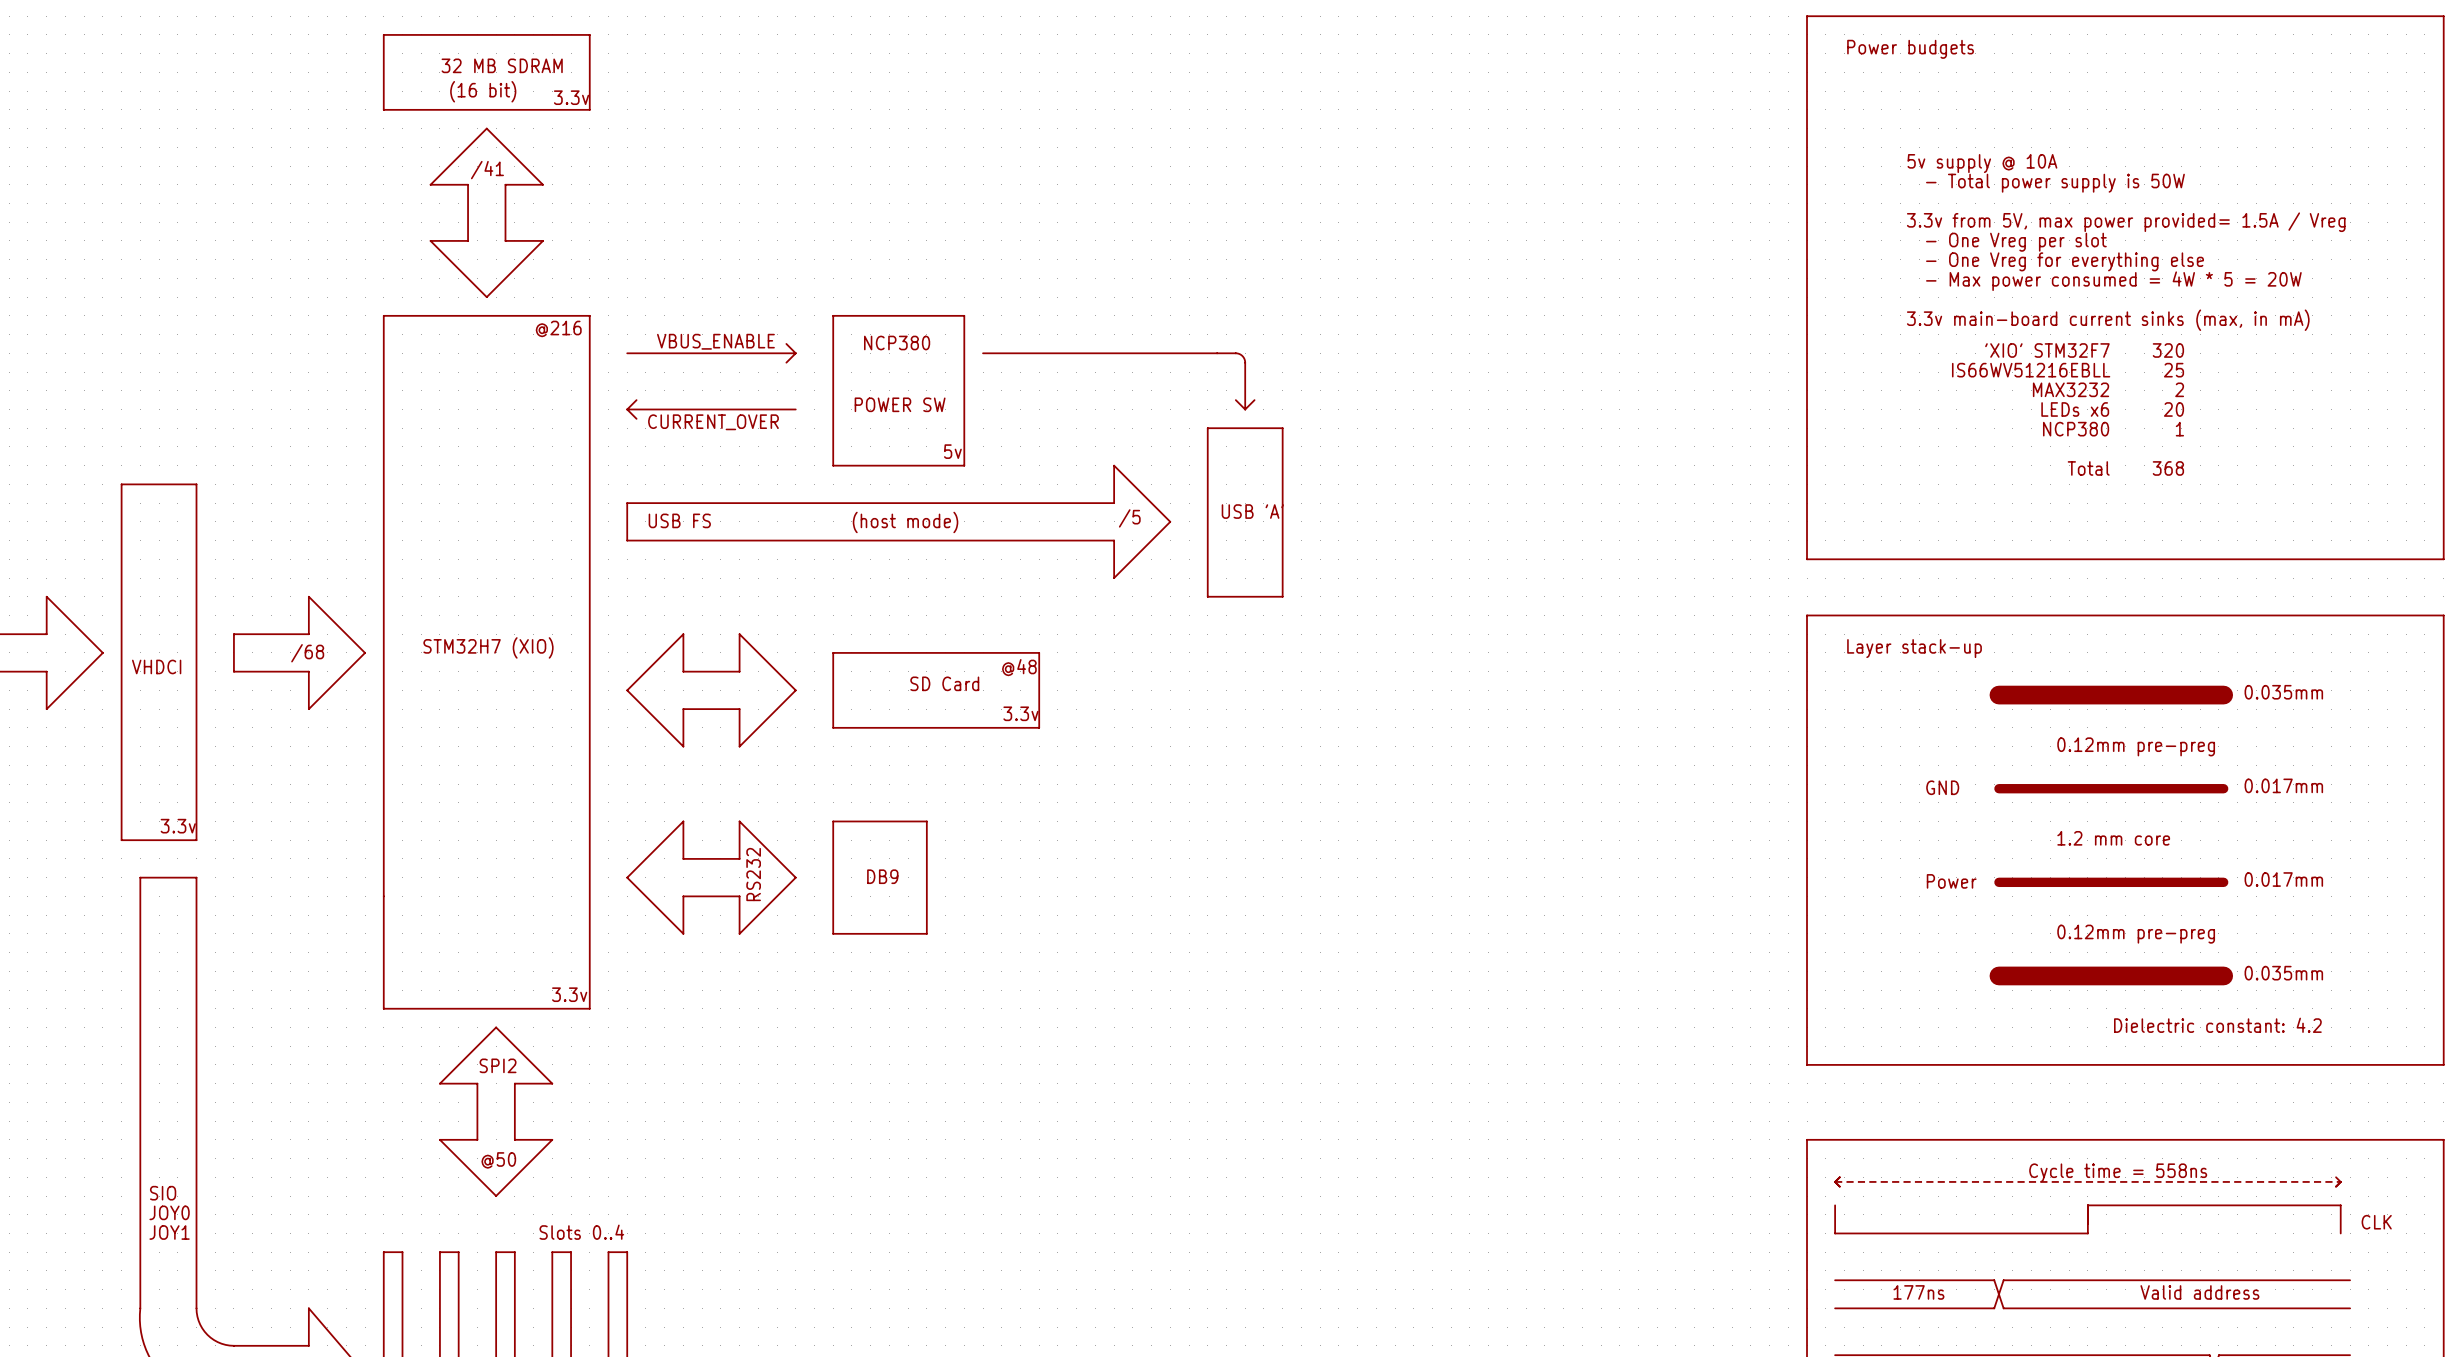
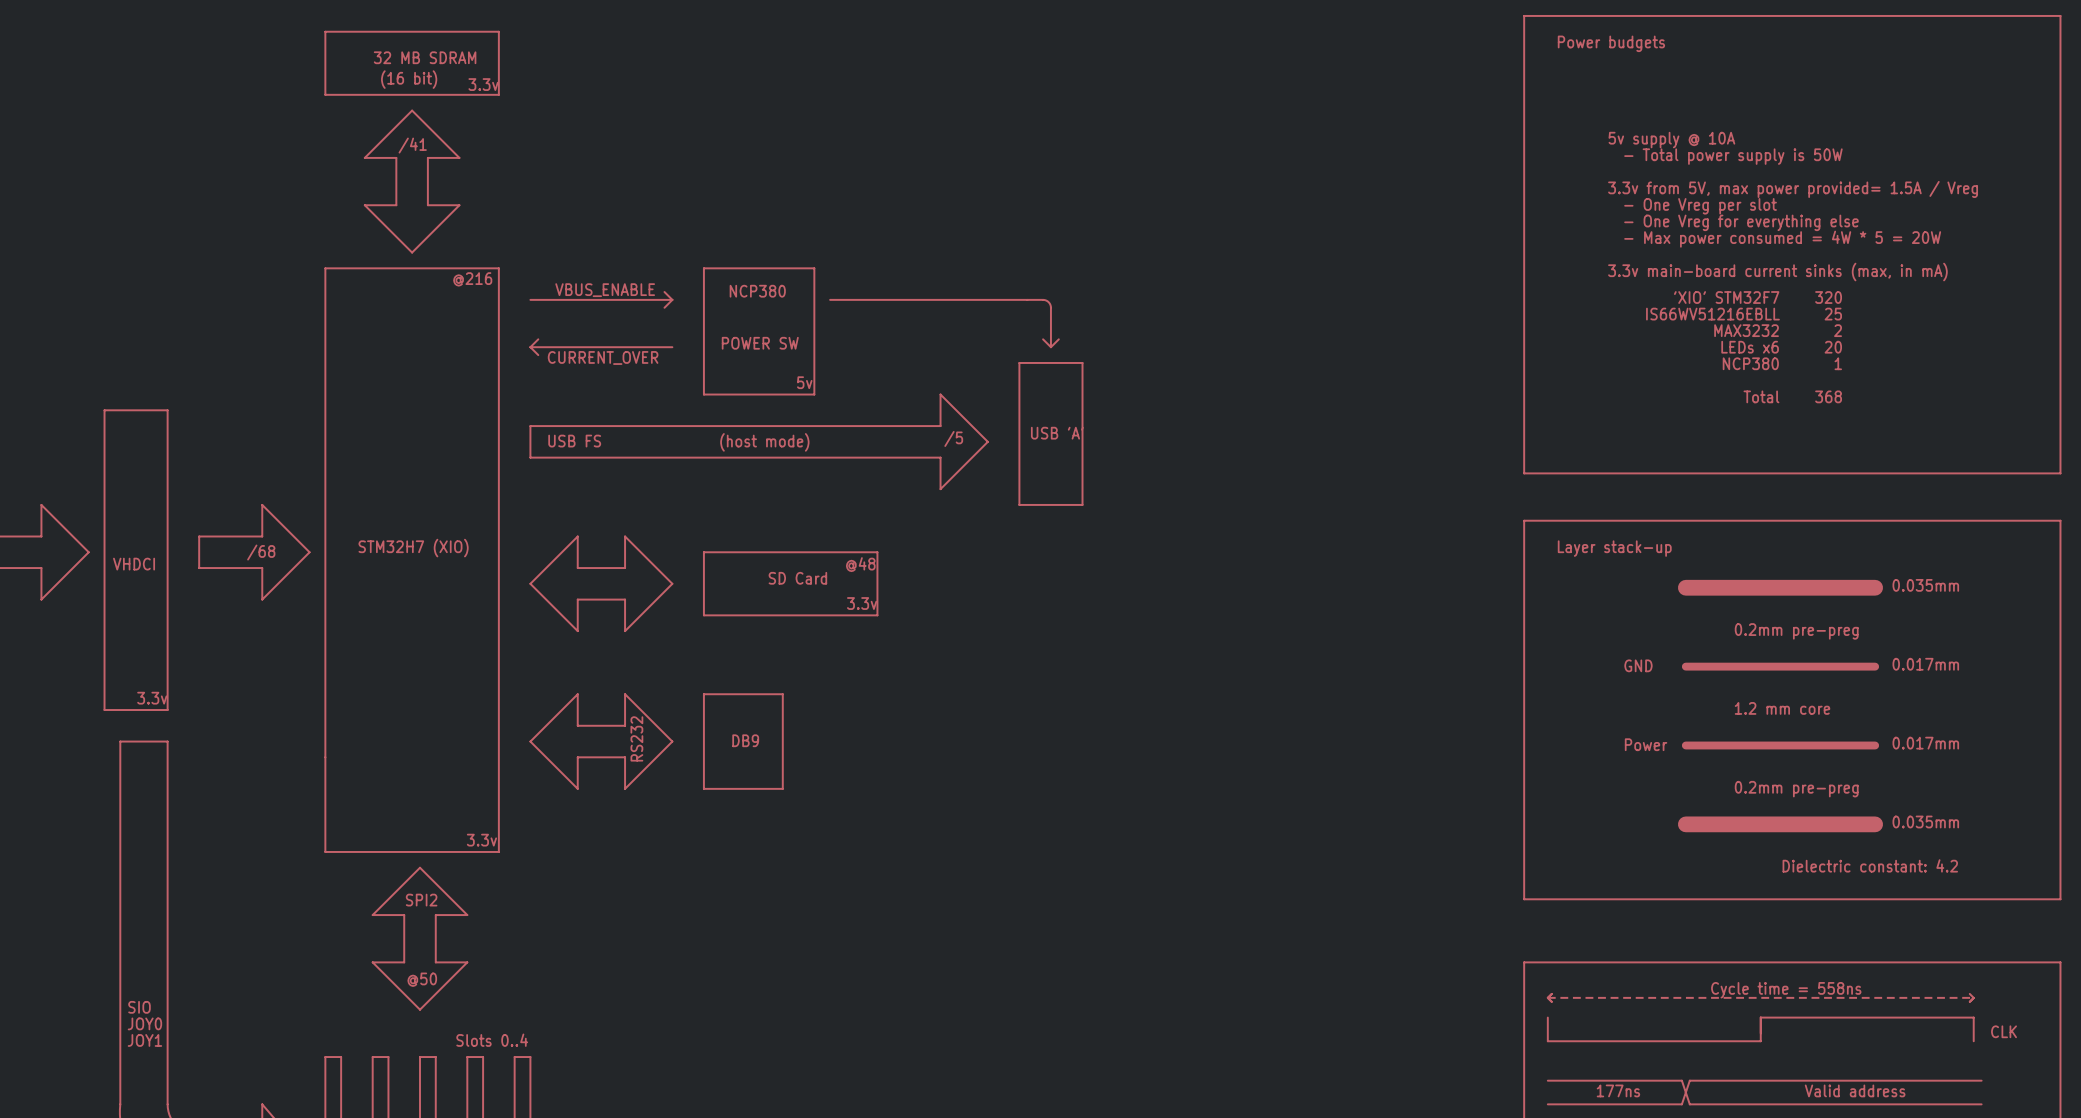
text: 0.12mm pre-preg (2136, 746) -> 0.2mm pre-preg (1796, 631)
text: 0.12mm pre-preg (2136, 934) -> 0.2mm pre-preg (1796, 789)

